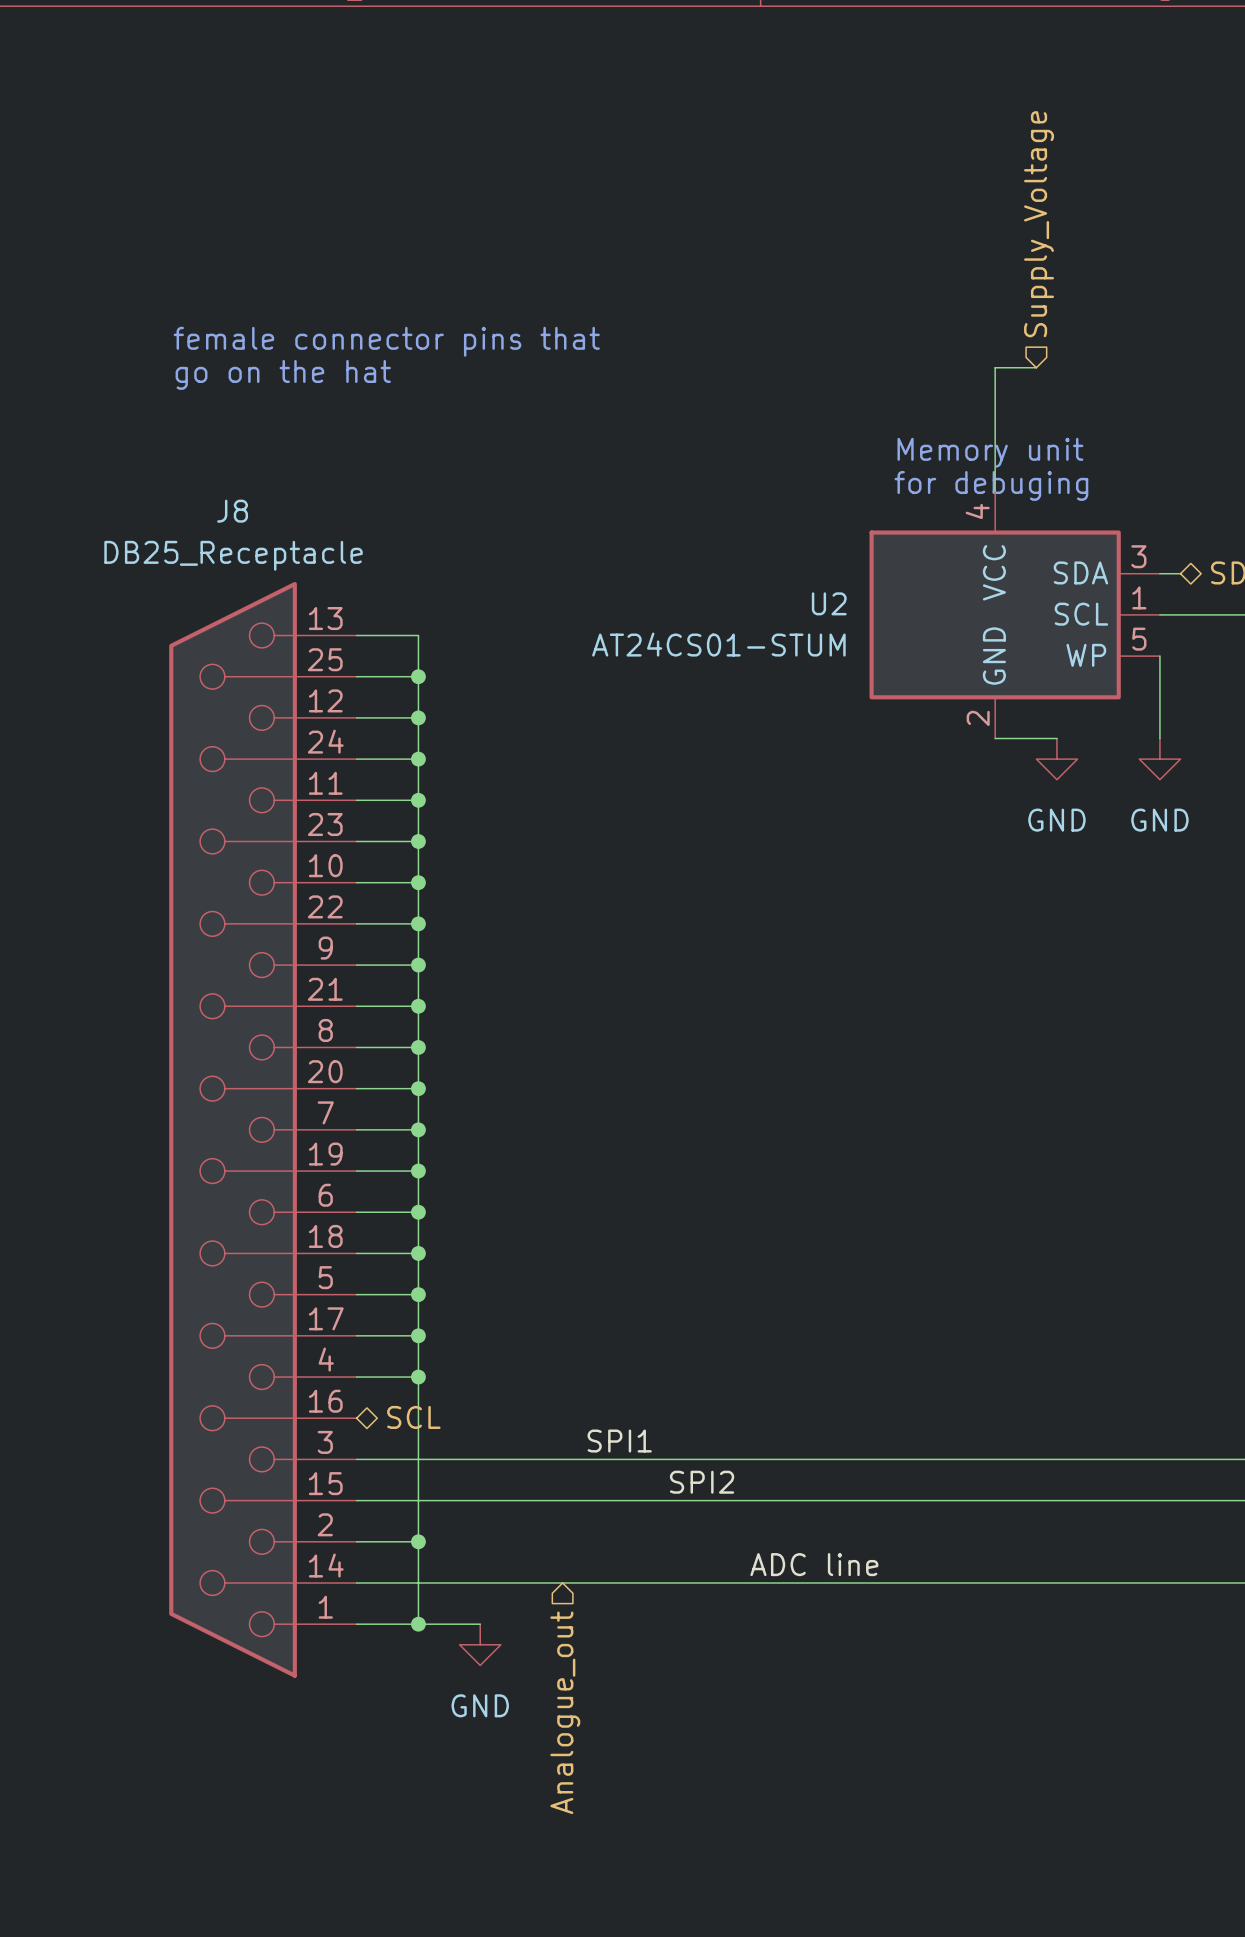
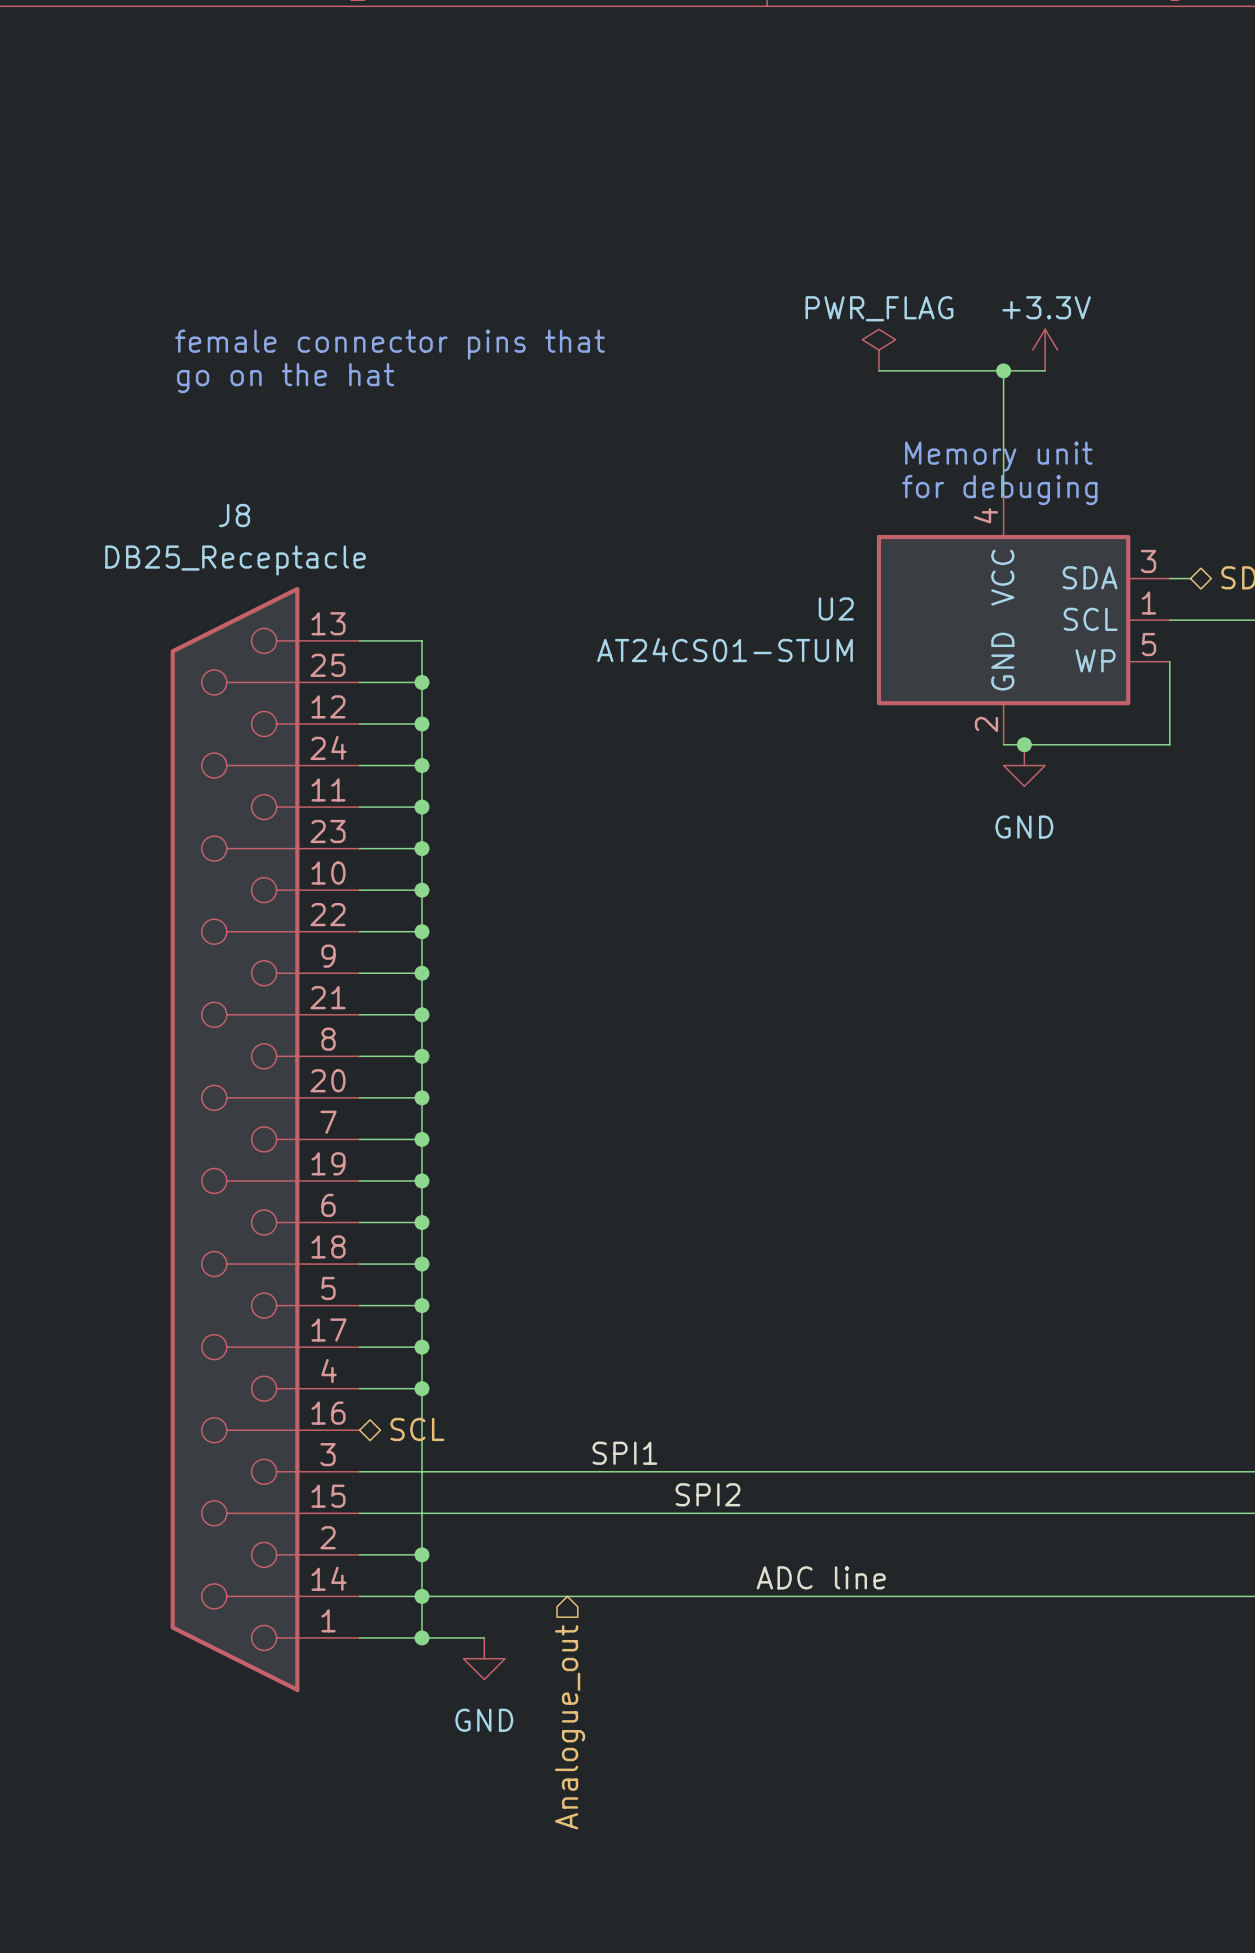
hierarchical label: Supply_Voltage (1039, 224) -> none
power symbol: none -> PWR_FLAG (878, 350)
power symbol: none -> +3.3V (1045, 350)
wire: none -> (878, 370) (1003, 370)
junction: none -> (1003, 370)
junction: none -> (1024, 744)
wire: none -> (1065, 744) (1169, 744)
power symbol position: GND (1056, 759) -> GND (1024, 765)
power symbol: GND (1159, 759) -> none
junction: none -> (421, 1596)

